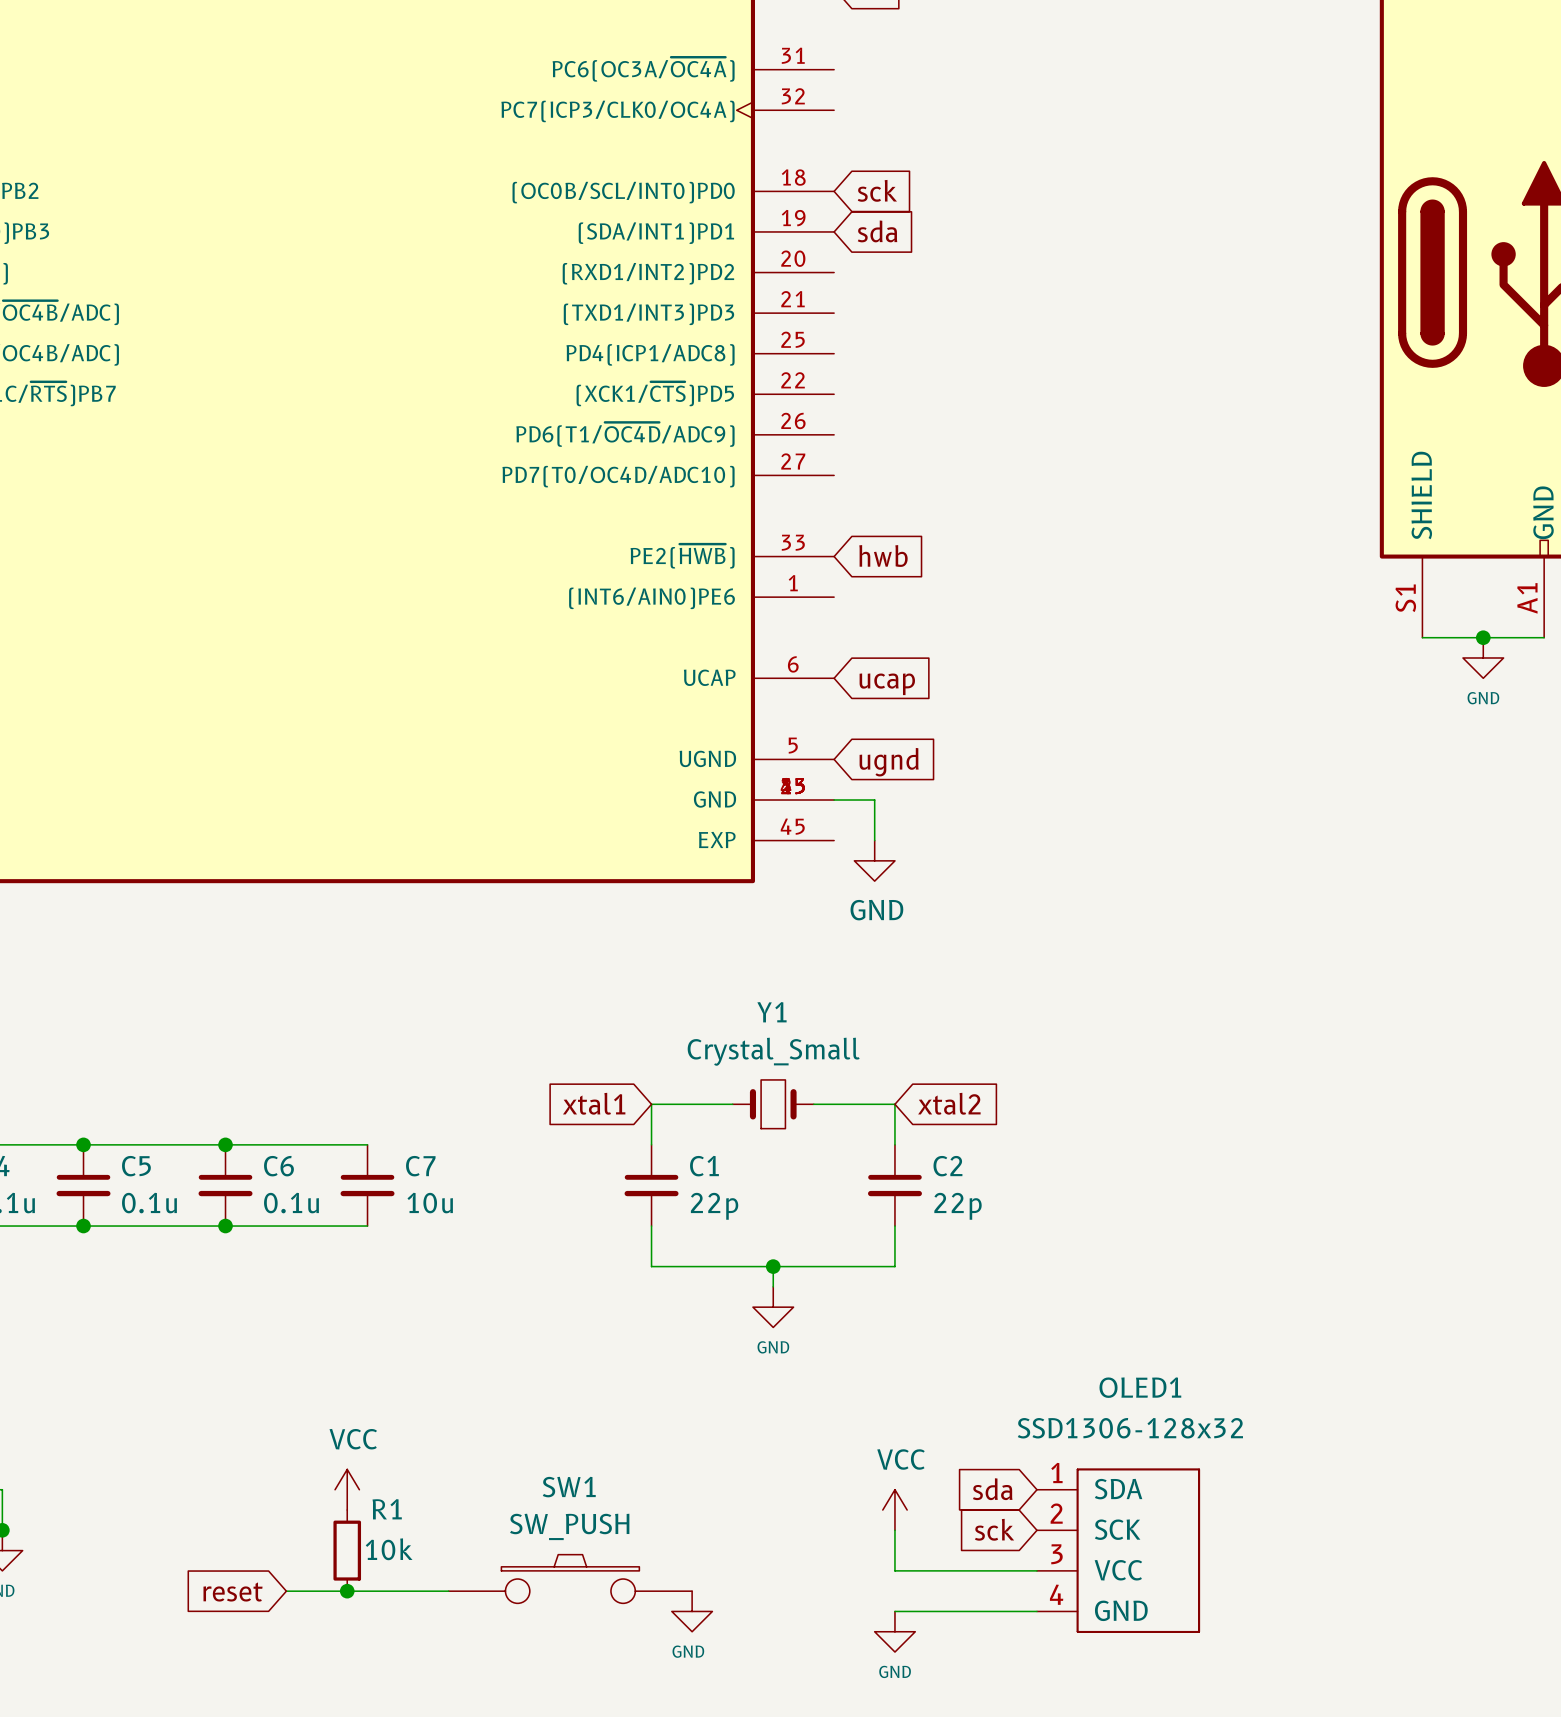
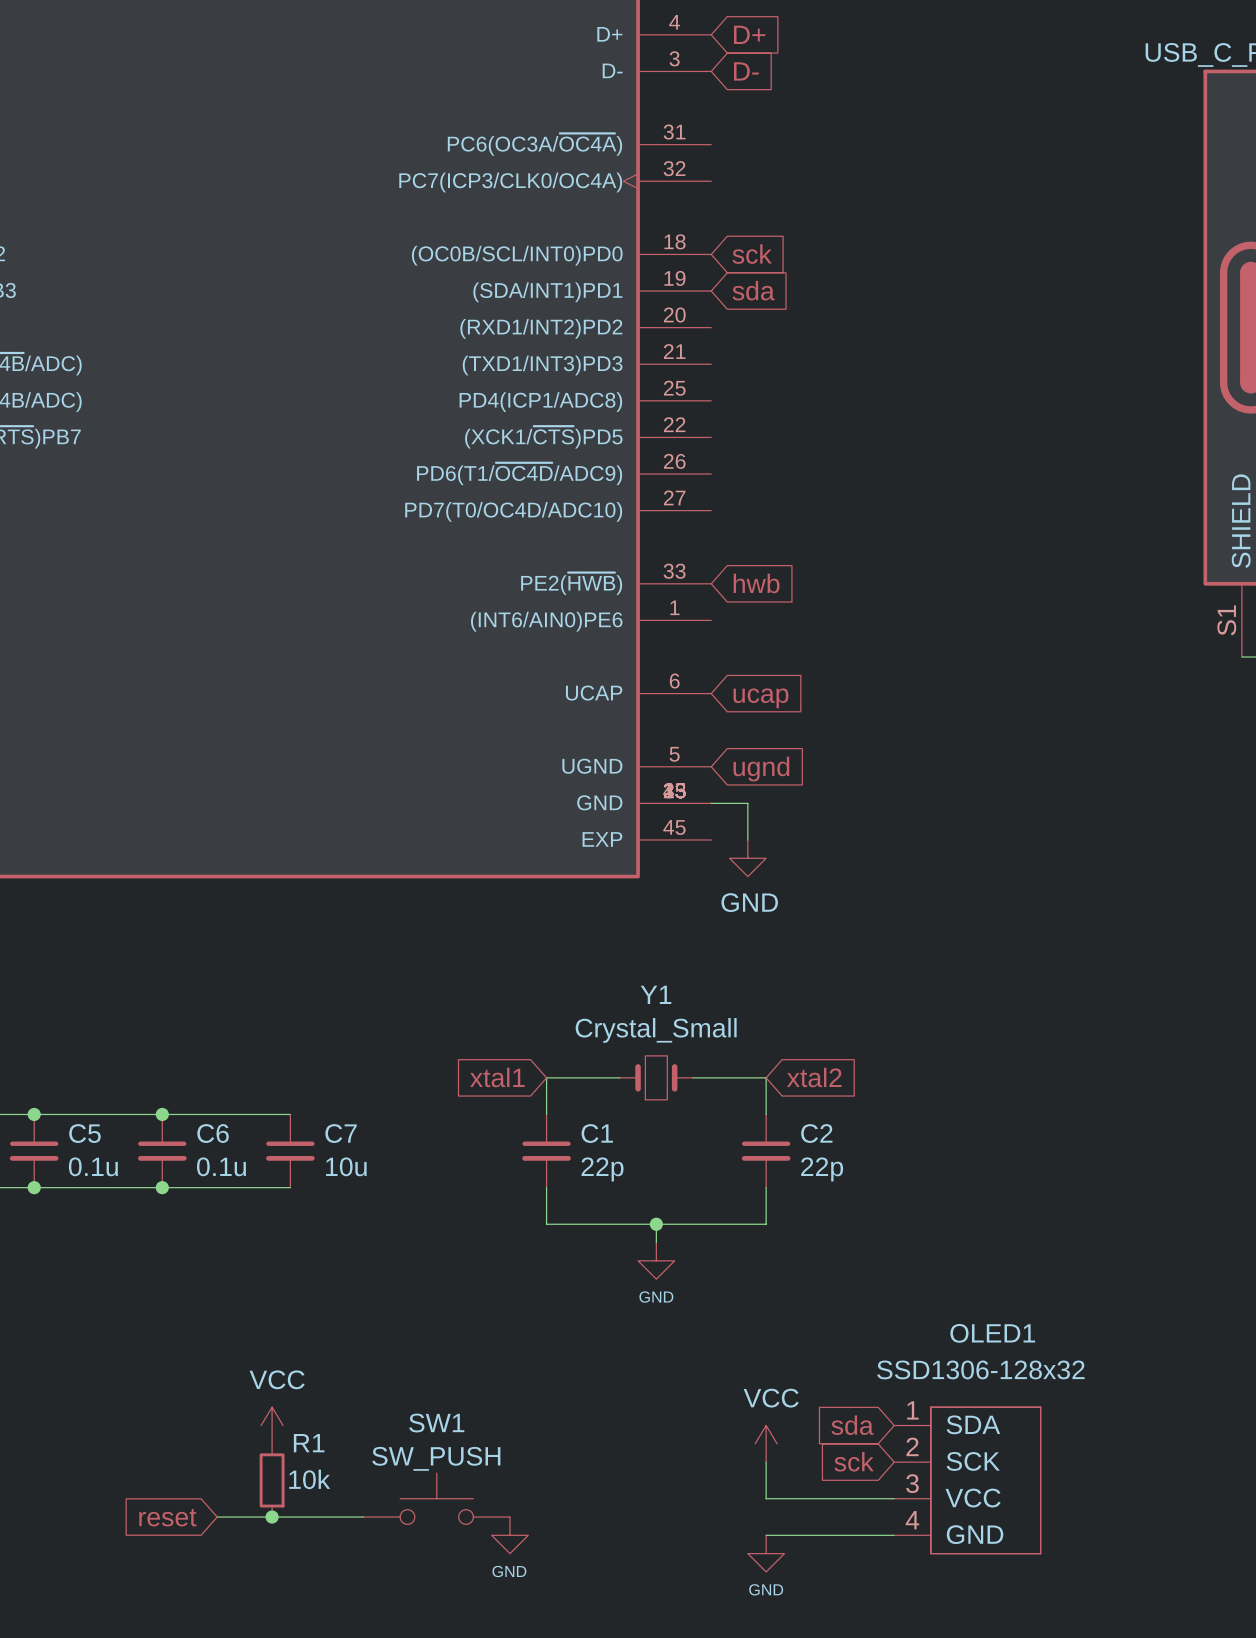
SW1 symbol: [448, 1554, 693, 1604] -> [363, 1473, 510, 1525]
power symbol position: GND (692, 1611) -> GND (509, 1535)

